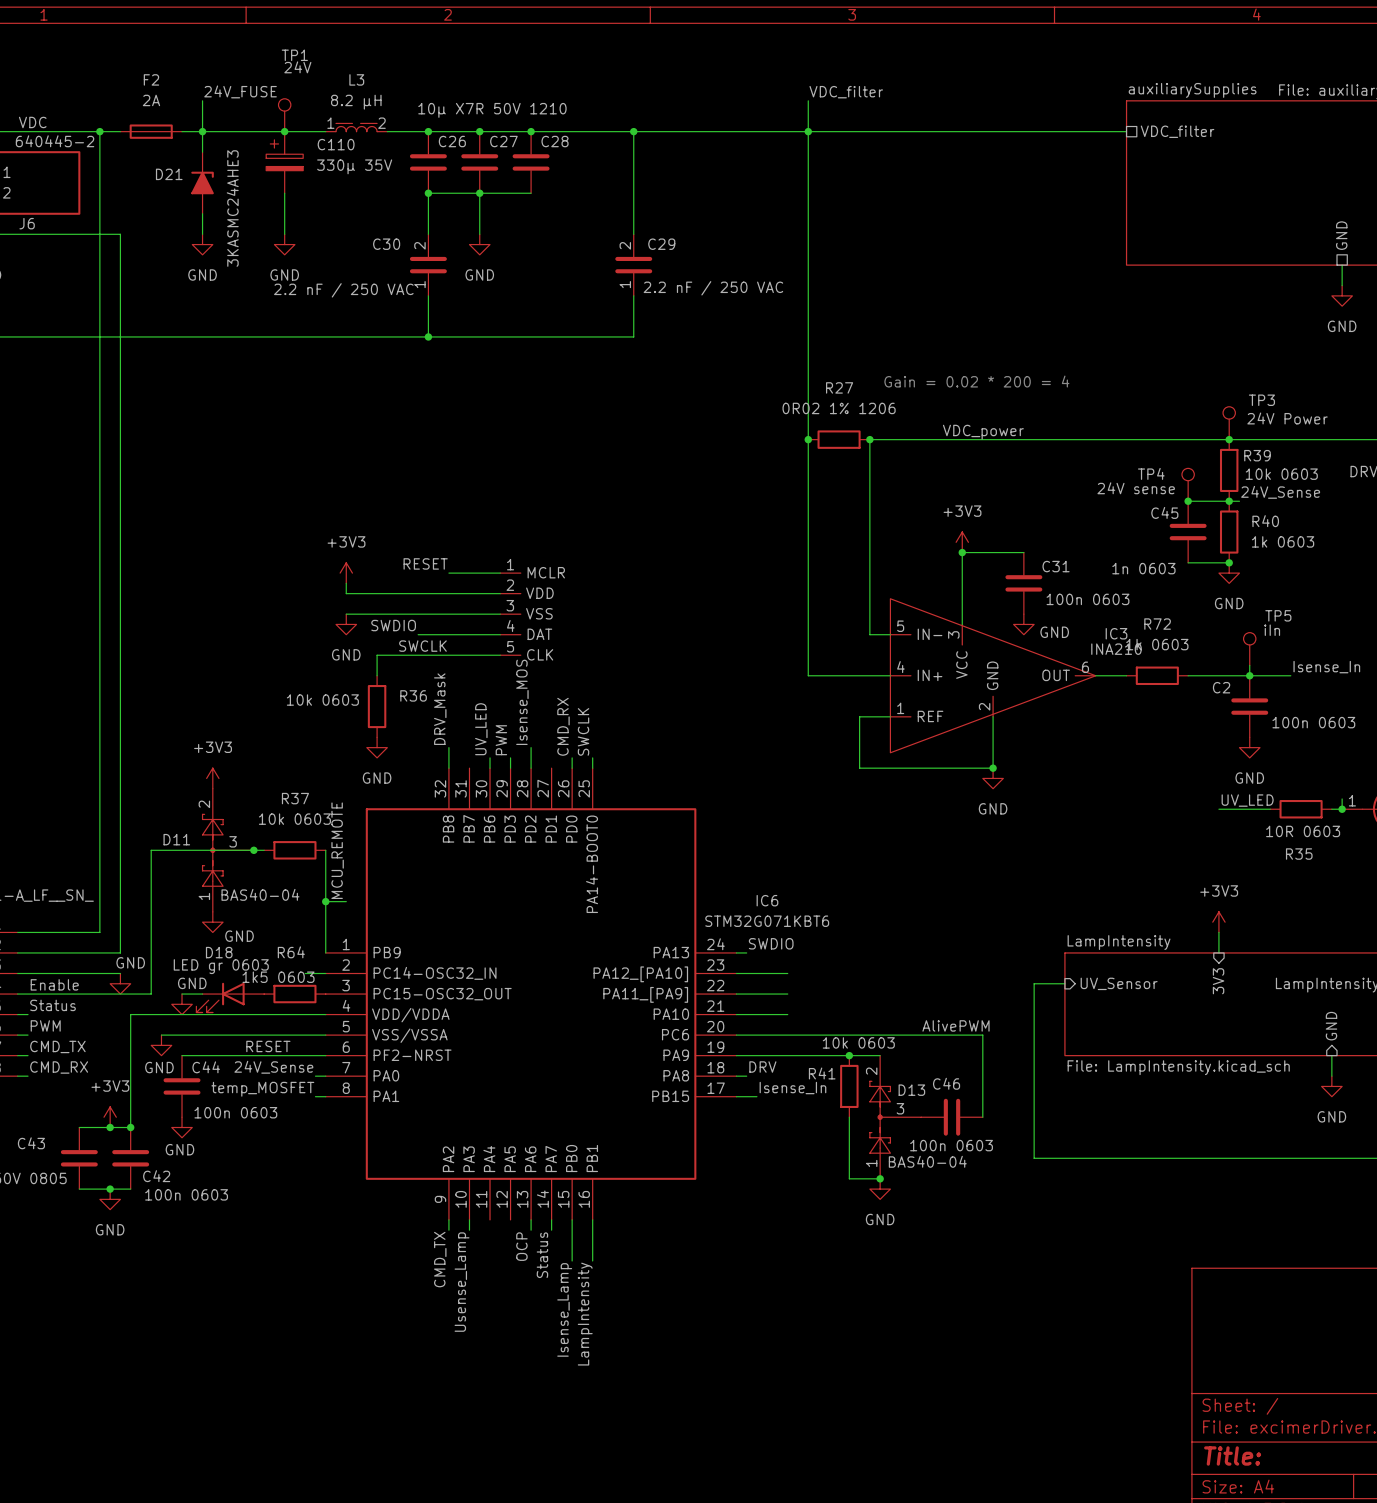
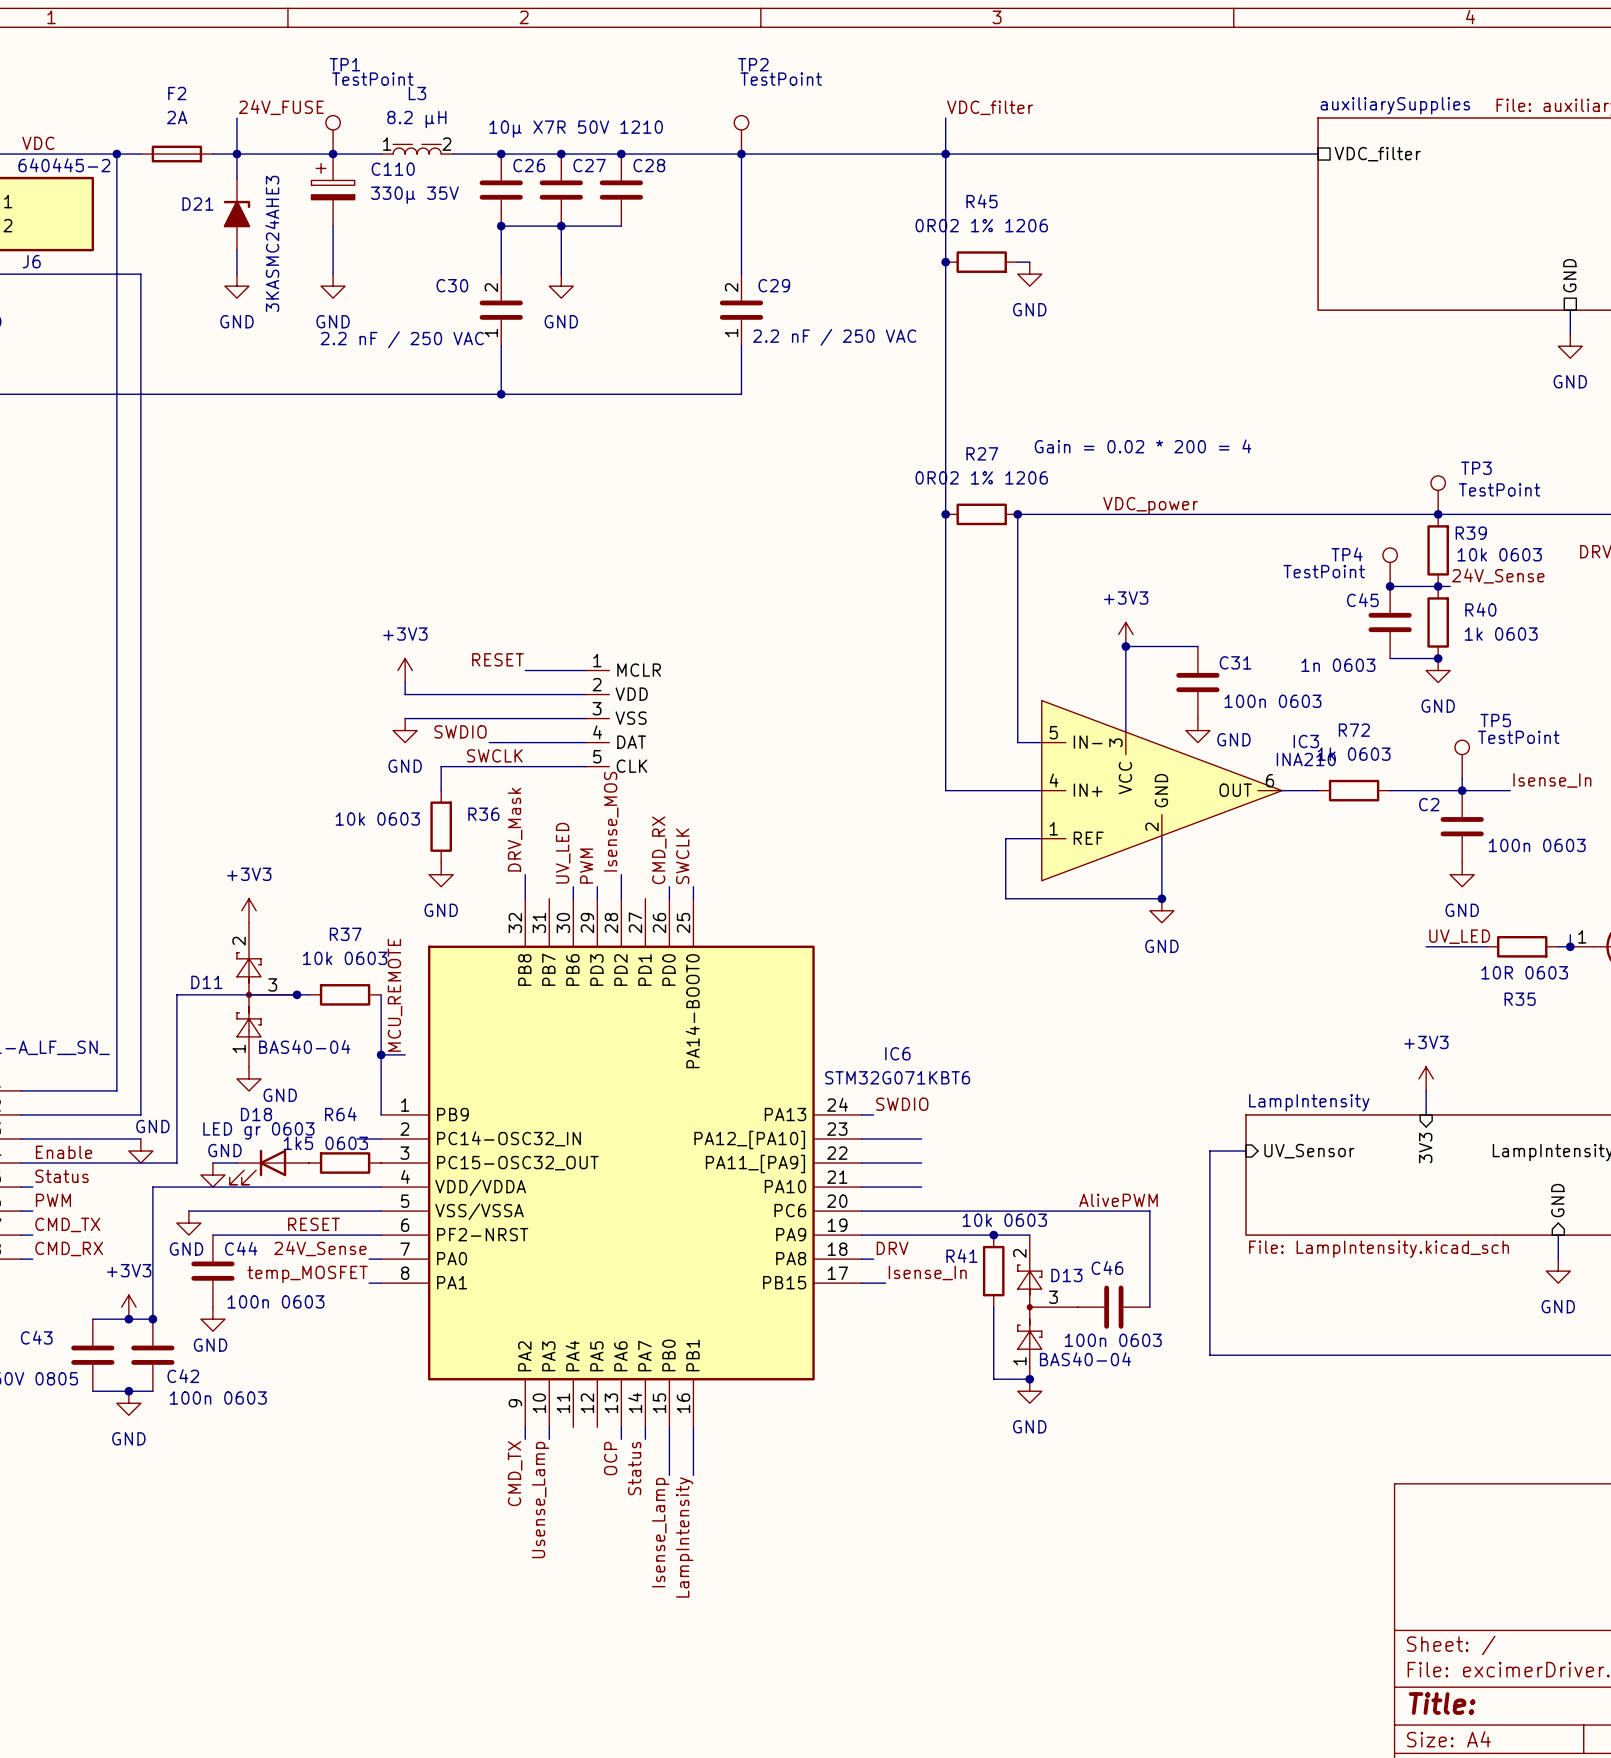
TP1 value: 24V (297, 67) -> TestPoint (372, 79)
TP2: none -> TestPoint (741, 134)
junction: none -> (945, 262)
R45: none -> 0R02 1% 1206 (981, 262)
wire: none -> (1017, 262) (1029, 262)
power symbol: none -> GND (1029, 274)
TP3 value: 24V Power (1287, 418) -> TestPoint (1499, 489)
TP4 value: 24V sense (1136, 488) -> TestPoint (1324, 571)
TP5 value: iIn (1272, 630) -> TestPoint (1518, 737)

